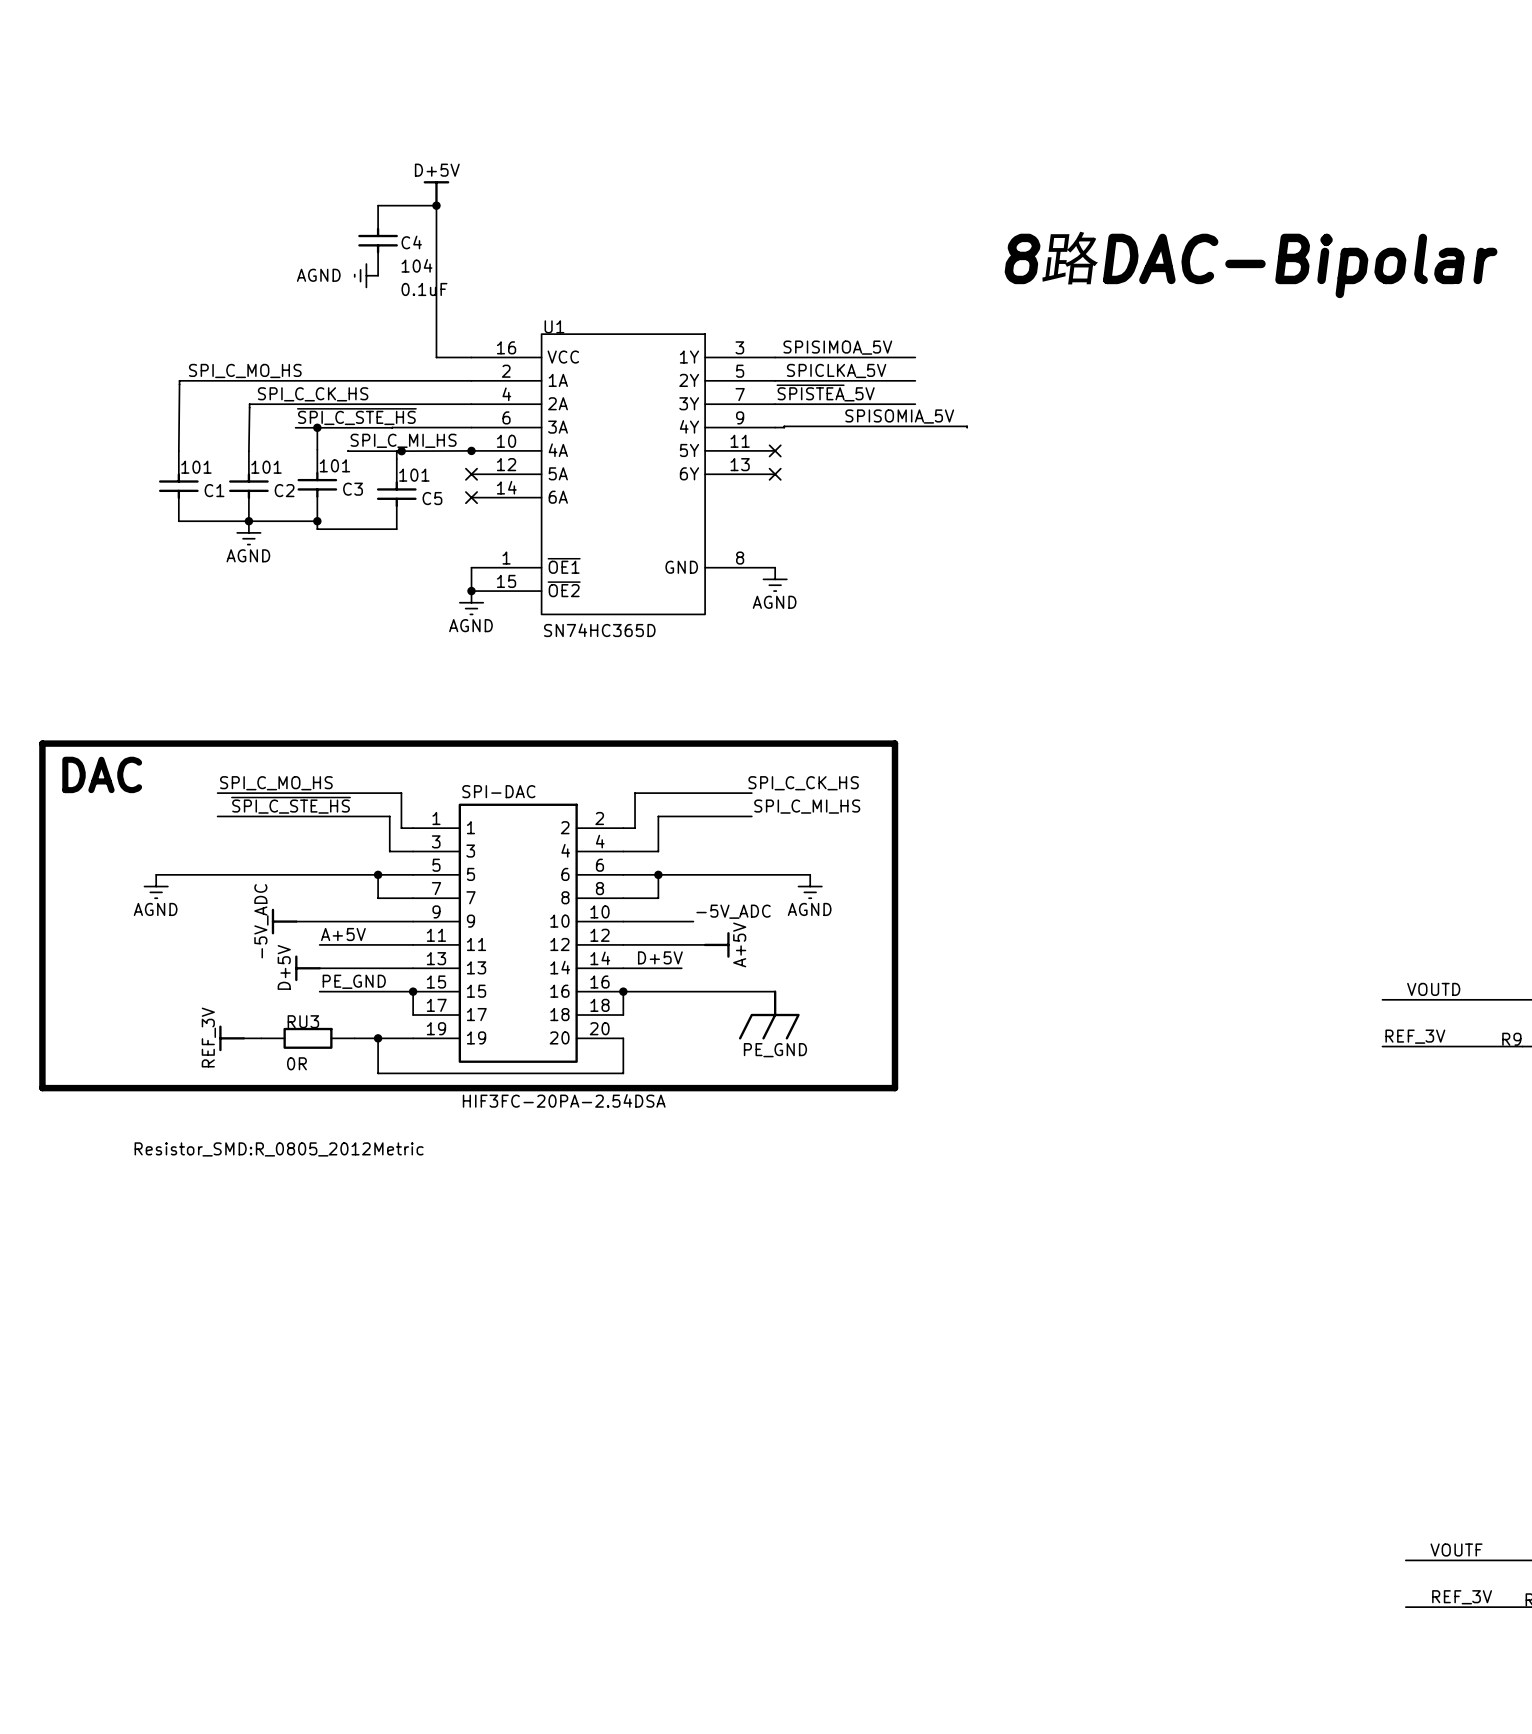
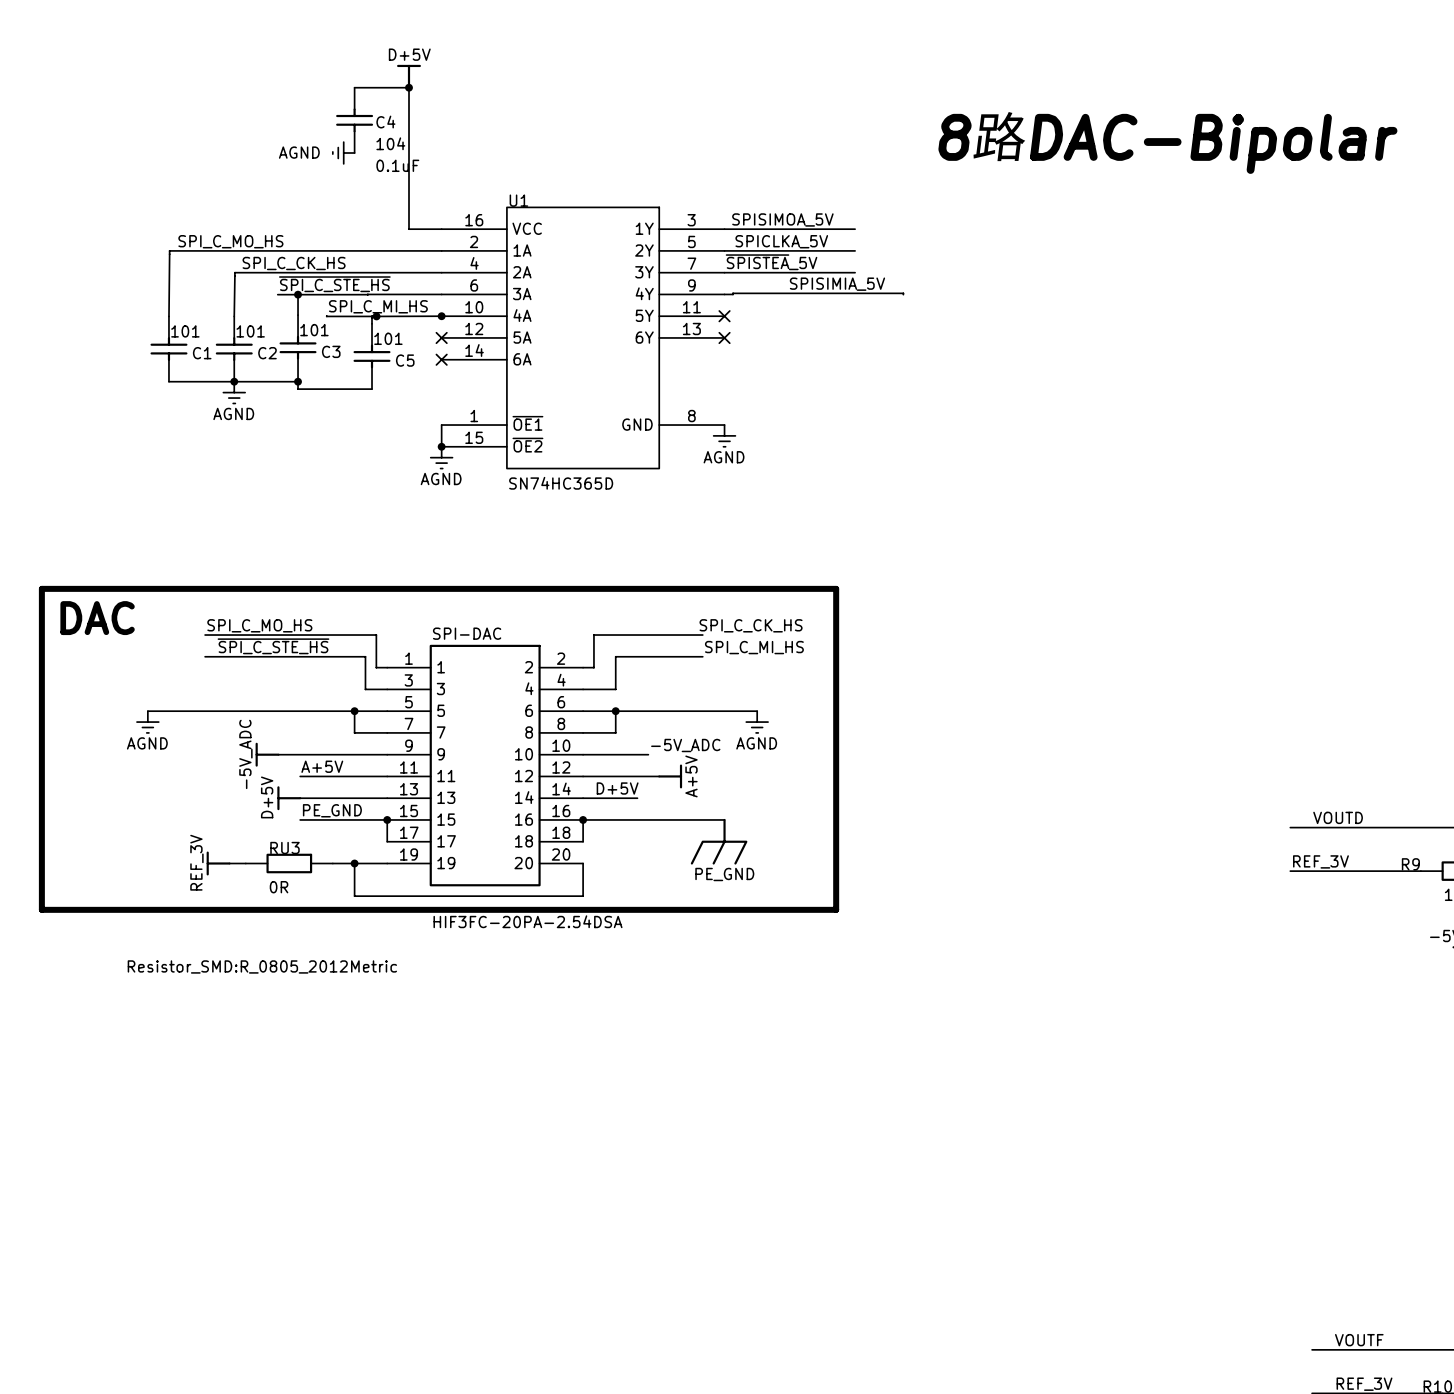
label: SPISOMIA_5V (899, 416) -> SPISIMIA_5V (837, 284)

